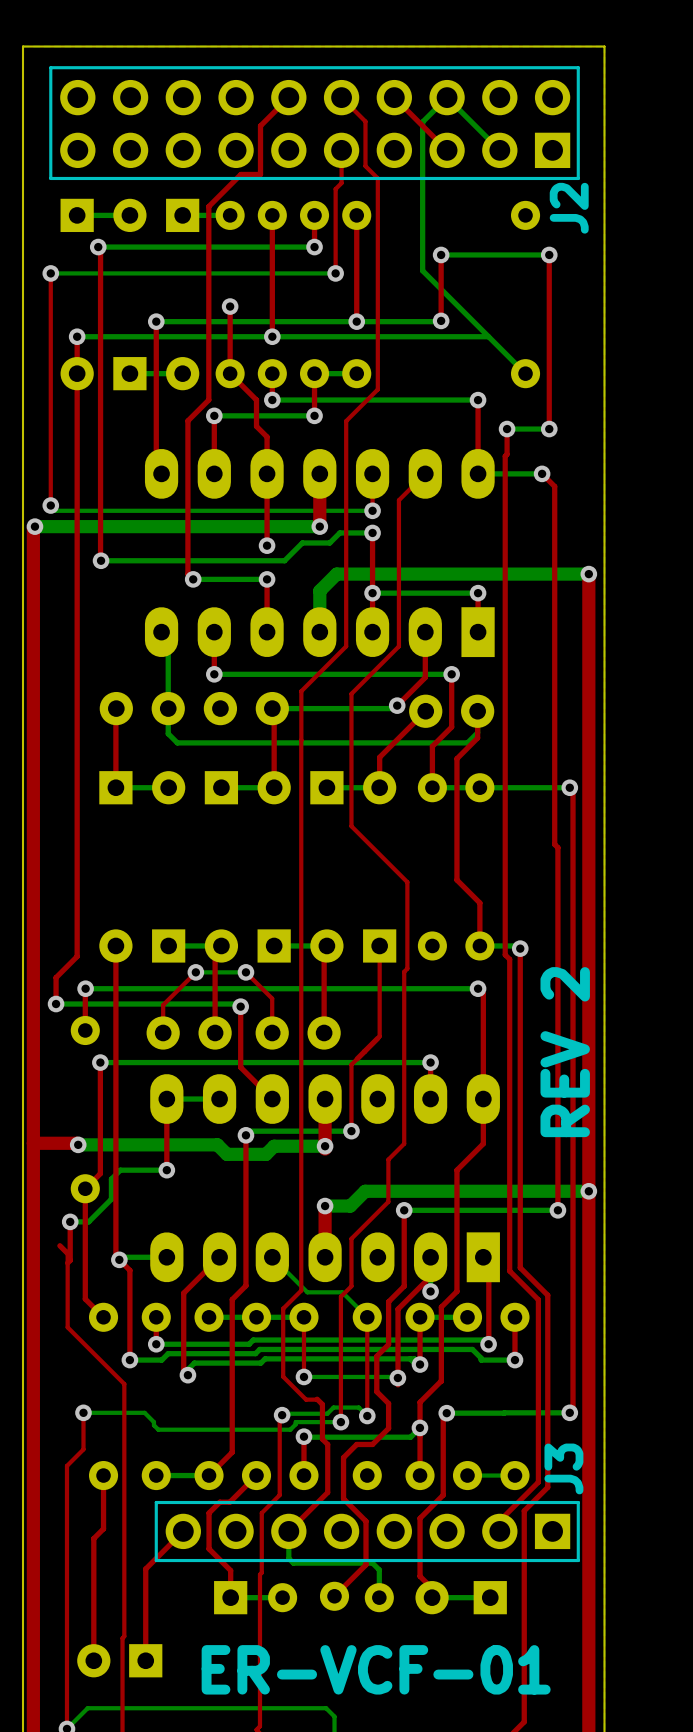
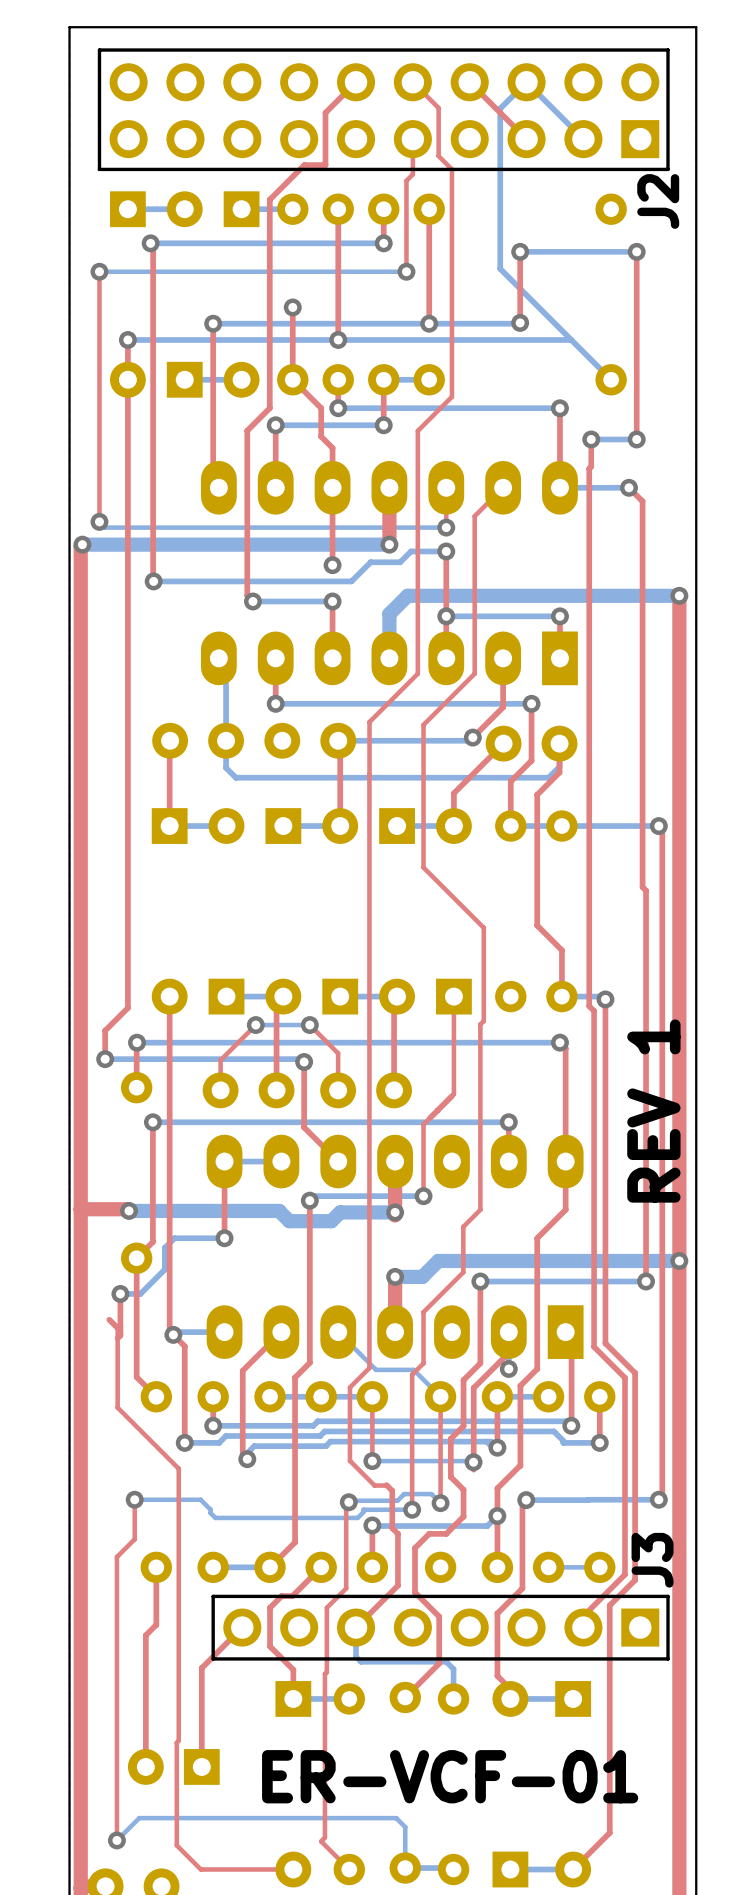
text: REV 2 (565, 1052) -> REV 1 (653, 1111)

